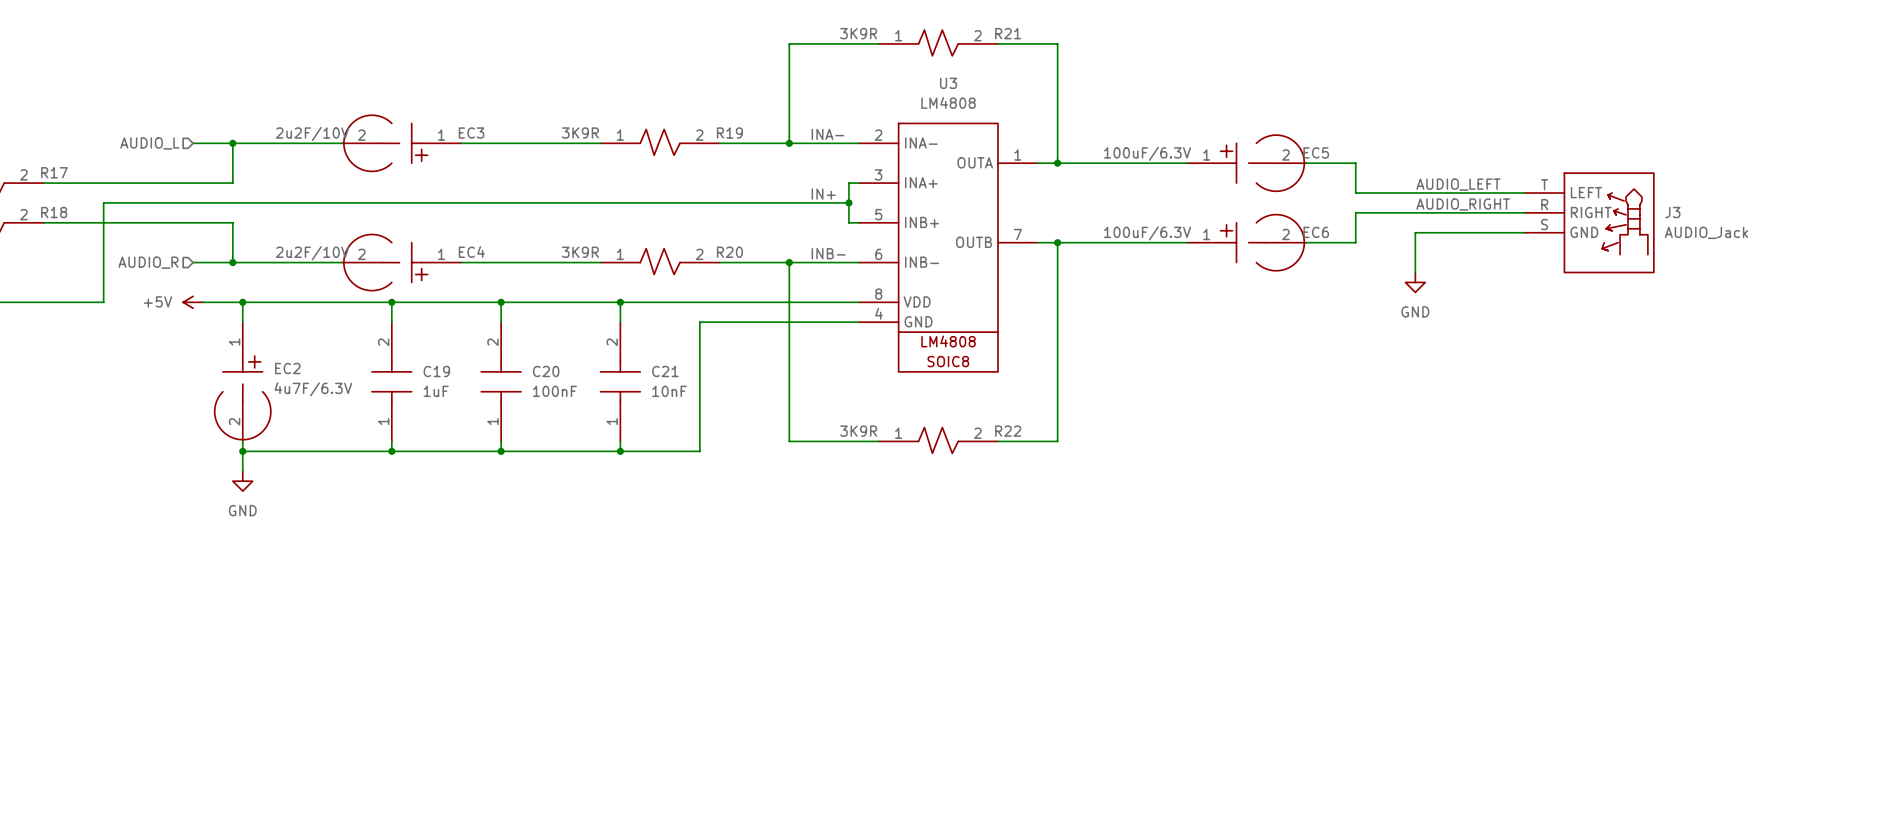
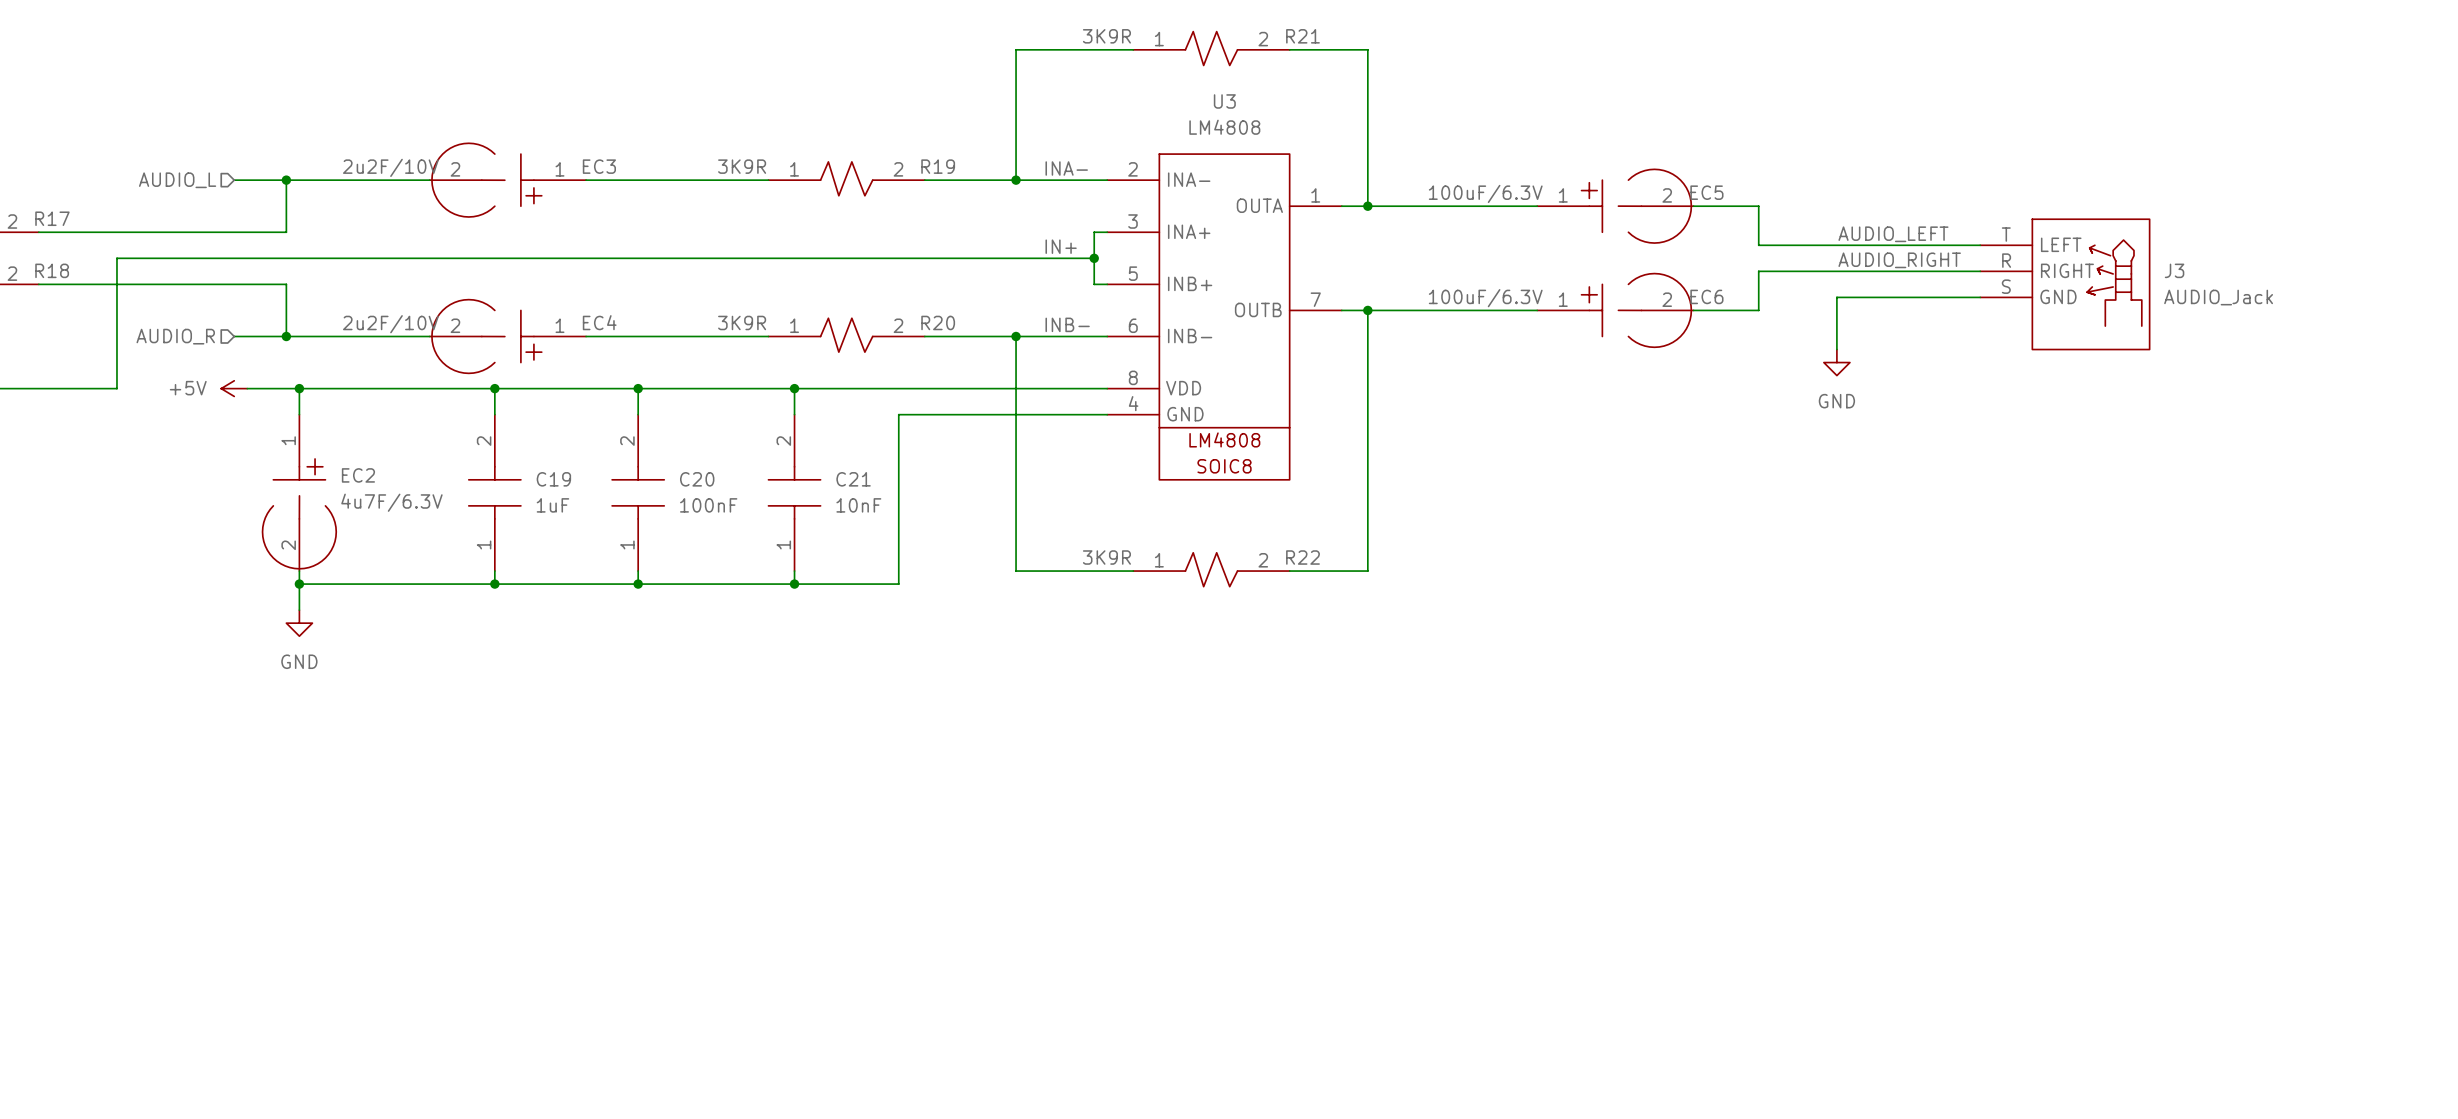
J3 symbol: [1524, 173, 1654, 273] -> [1980, 219, 2150, 350]

